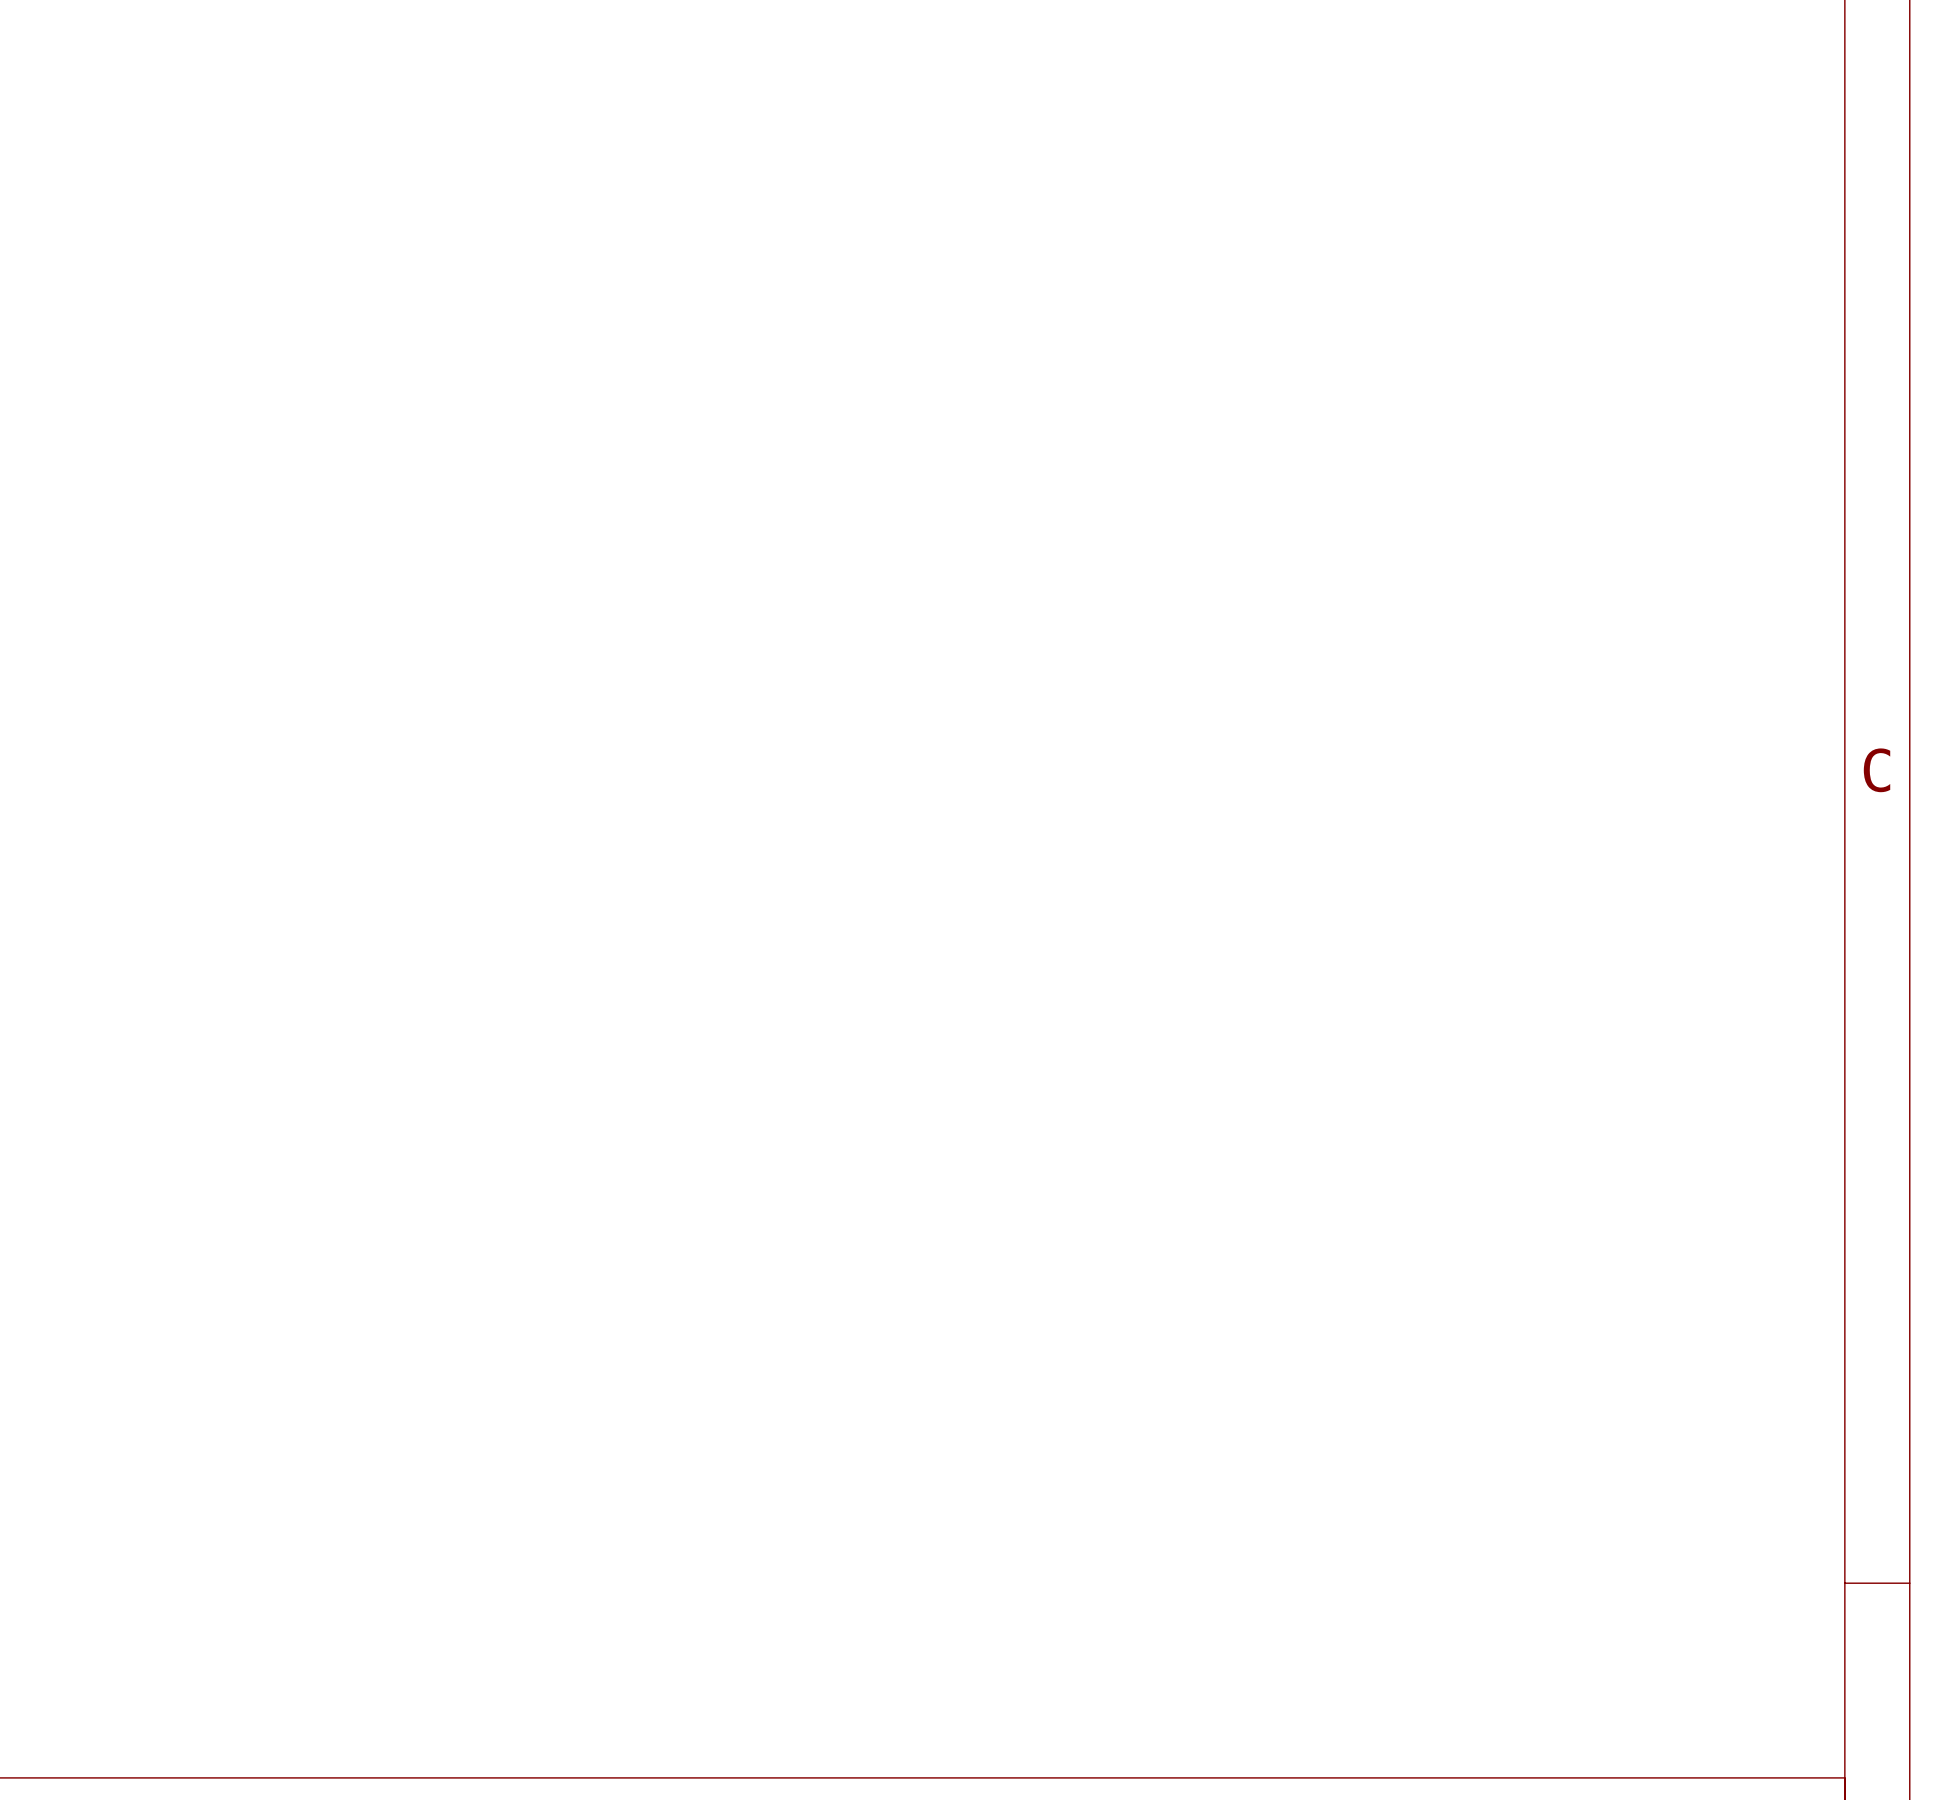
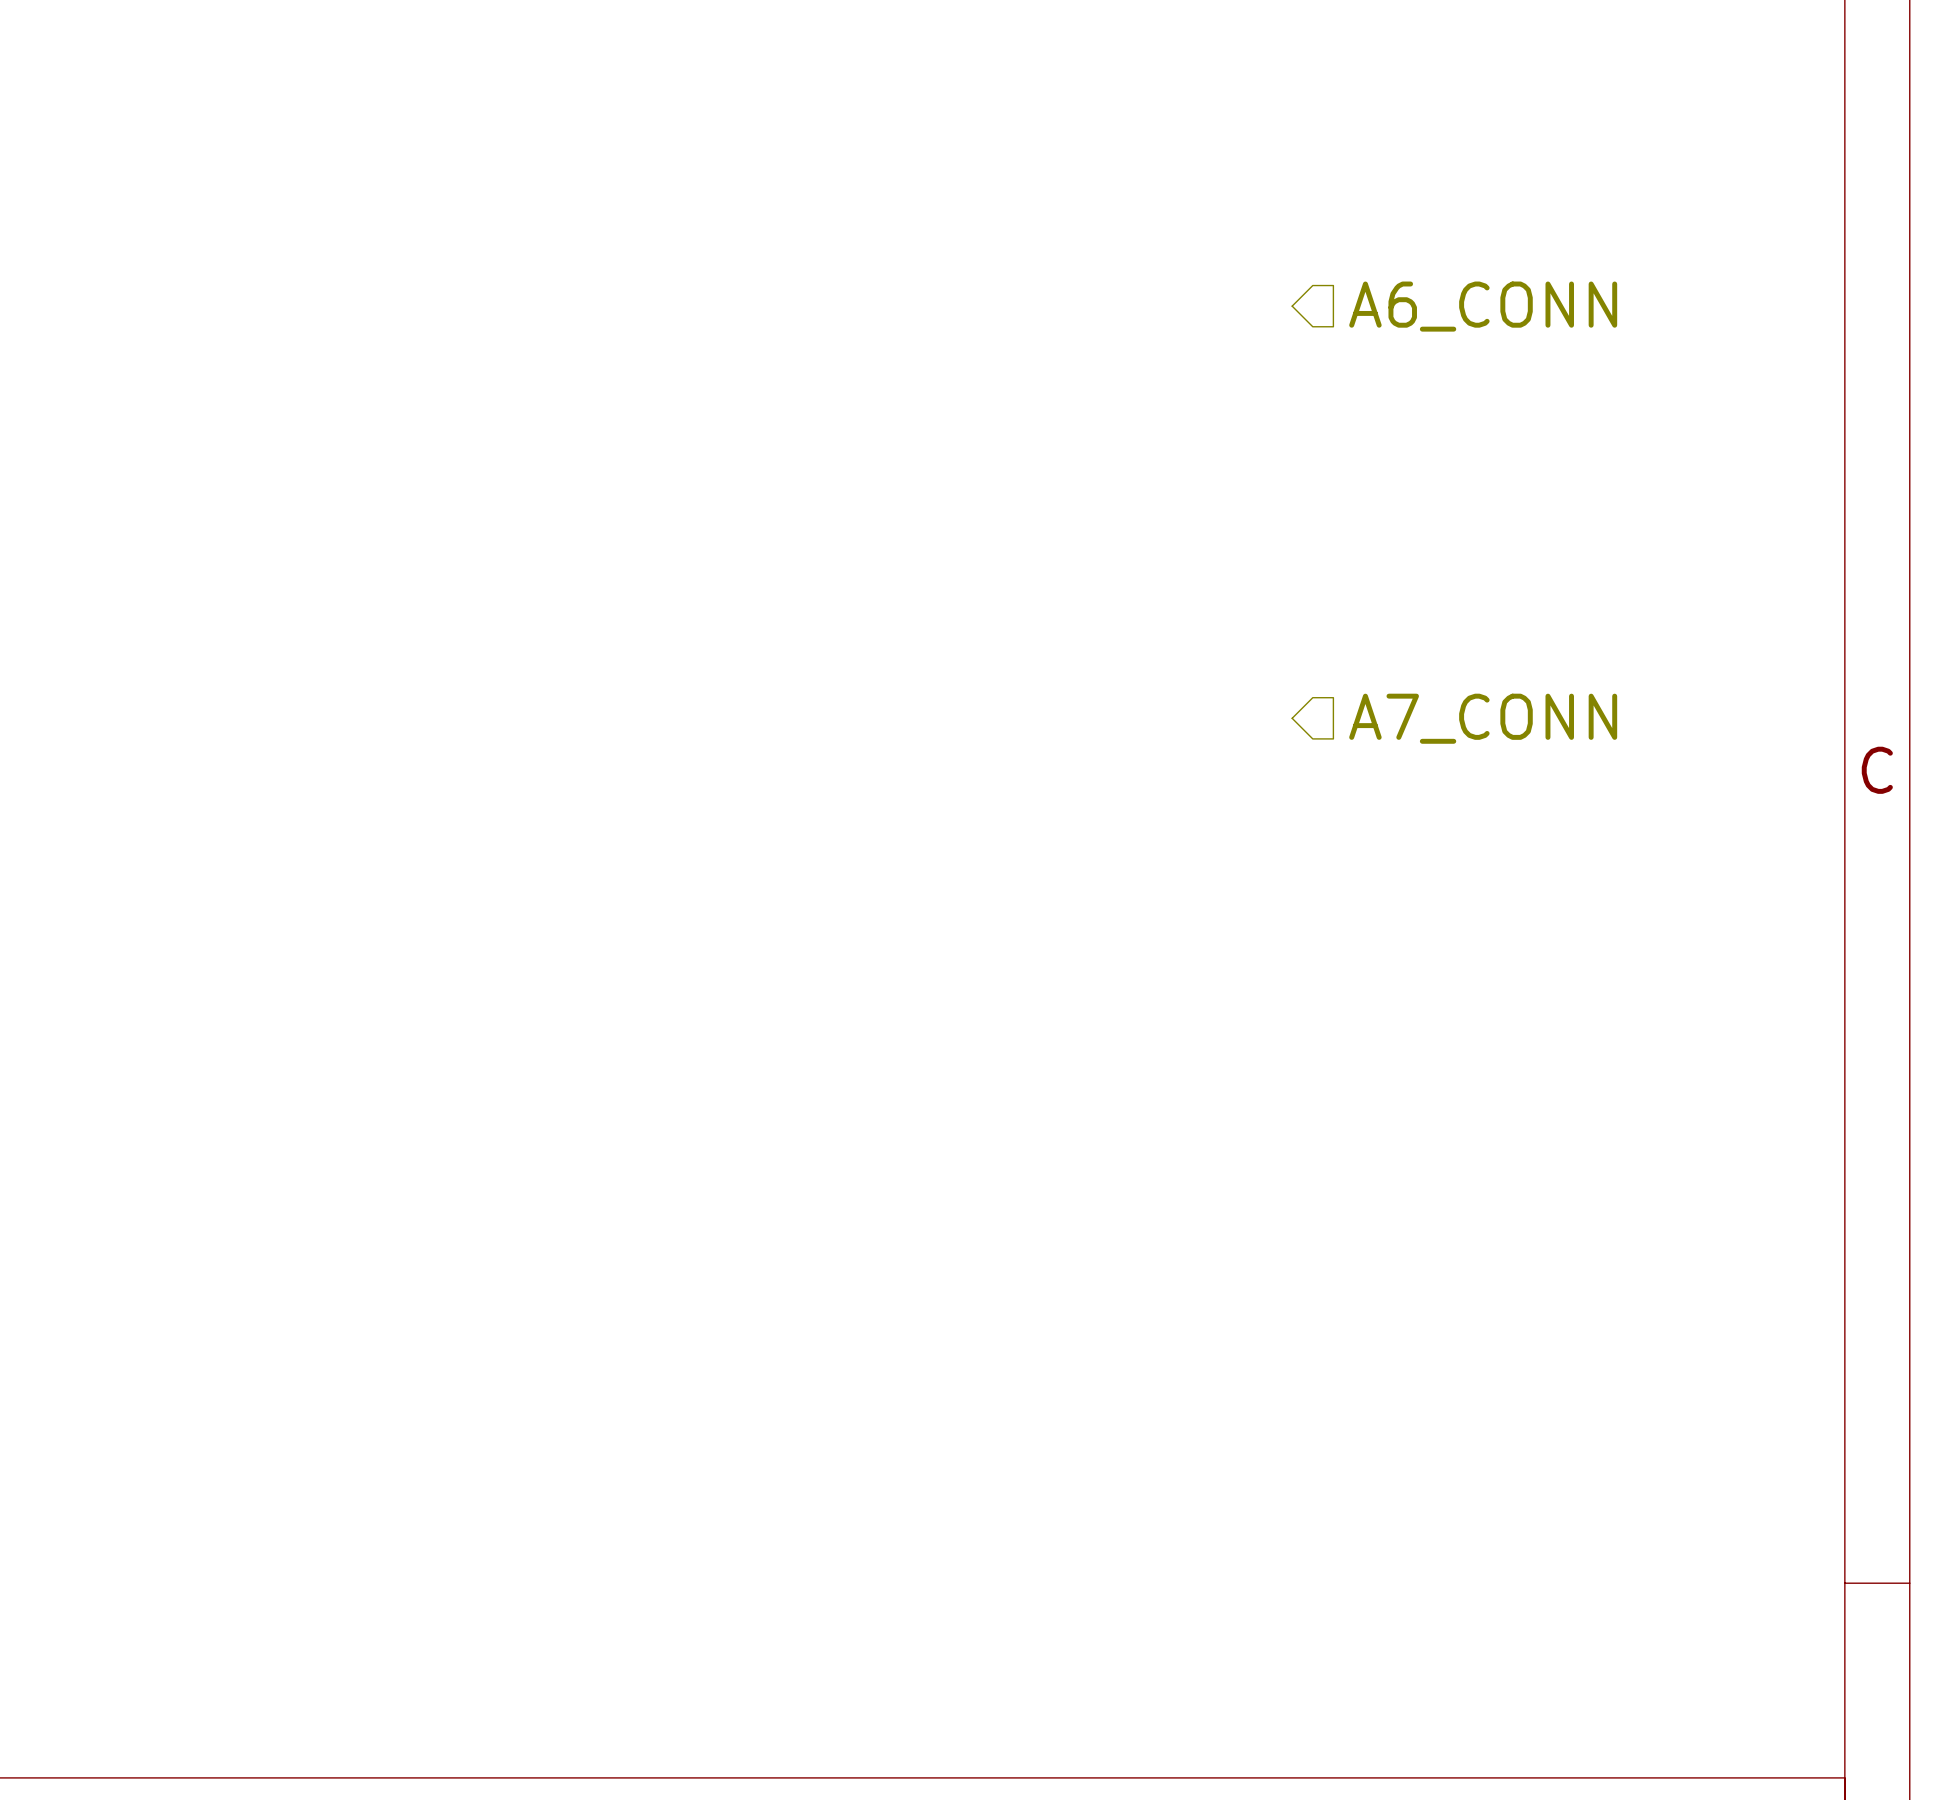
hierarchical label: none -> A6_CONN (1483, 306)
hierarchical label: none -> A7_CONN (1483, 718)

